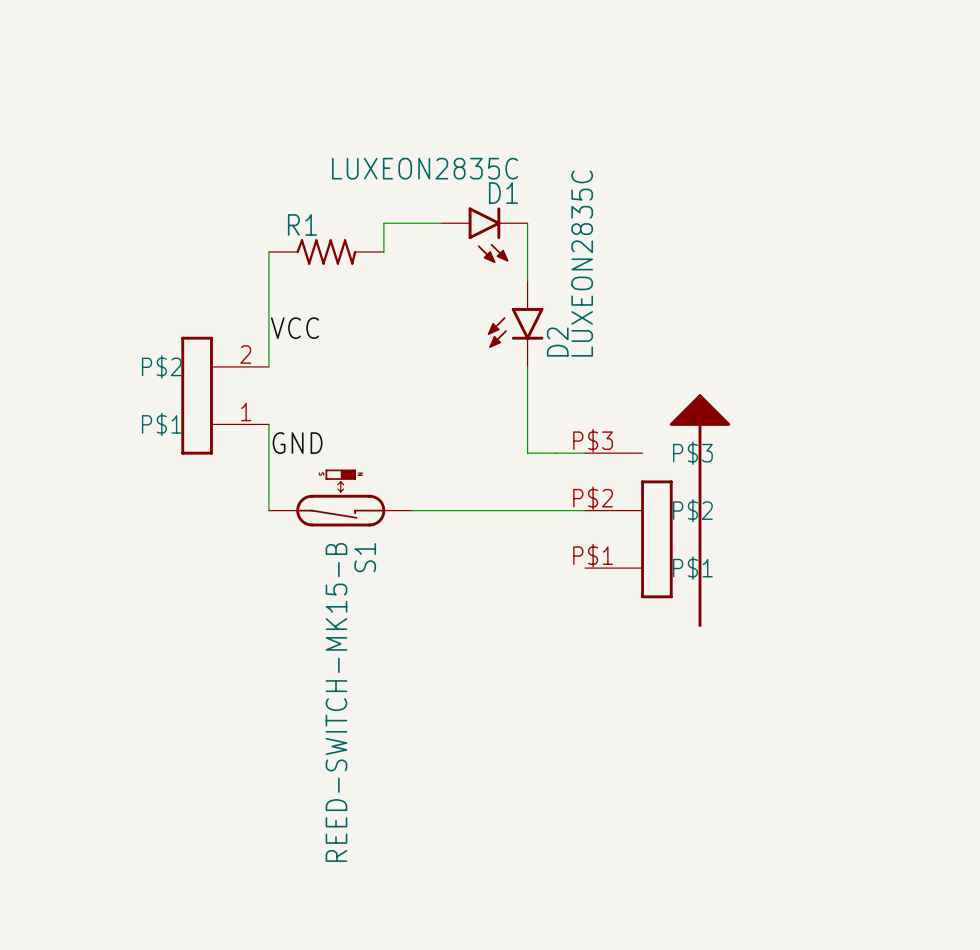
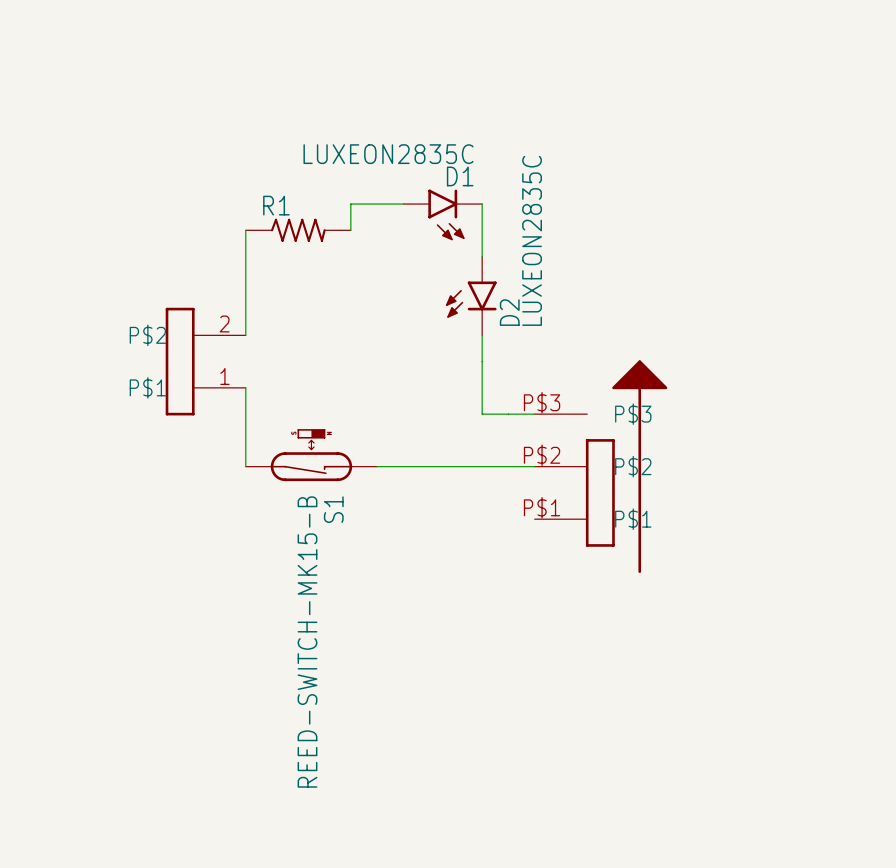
label: VCC (295, 328) -> none
label: GND (297, 443) -> none

